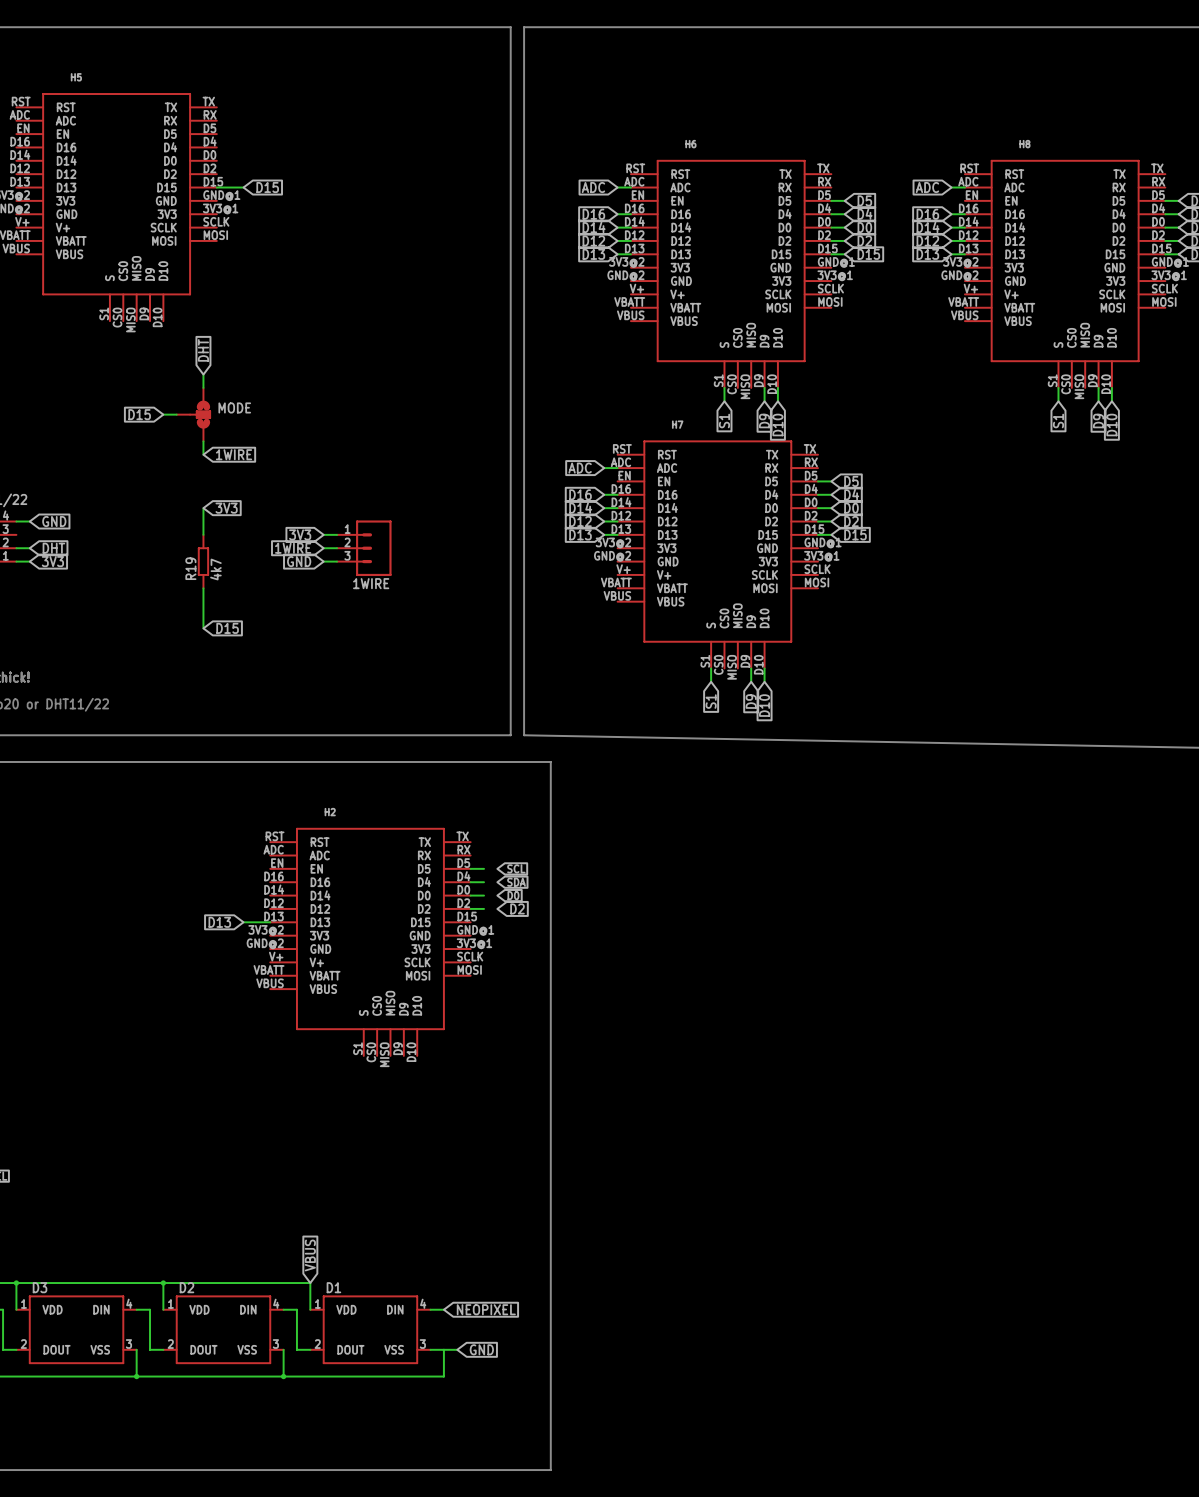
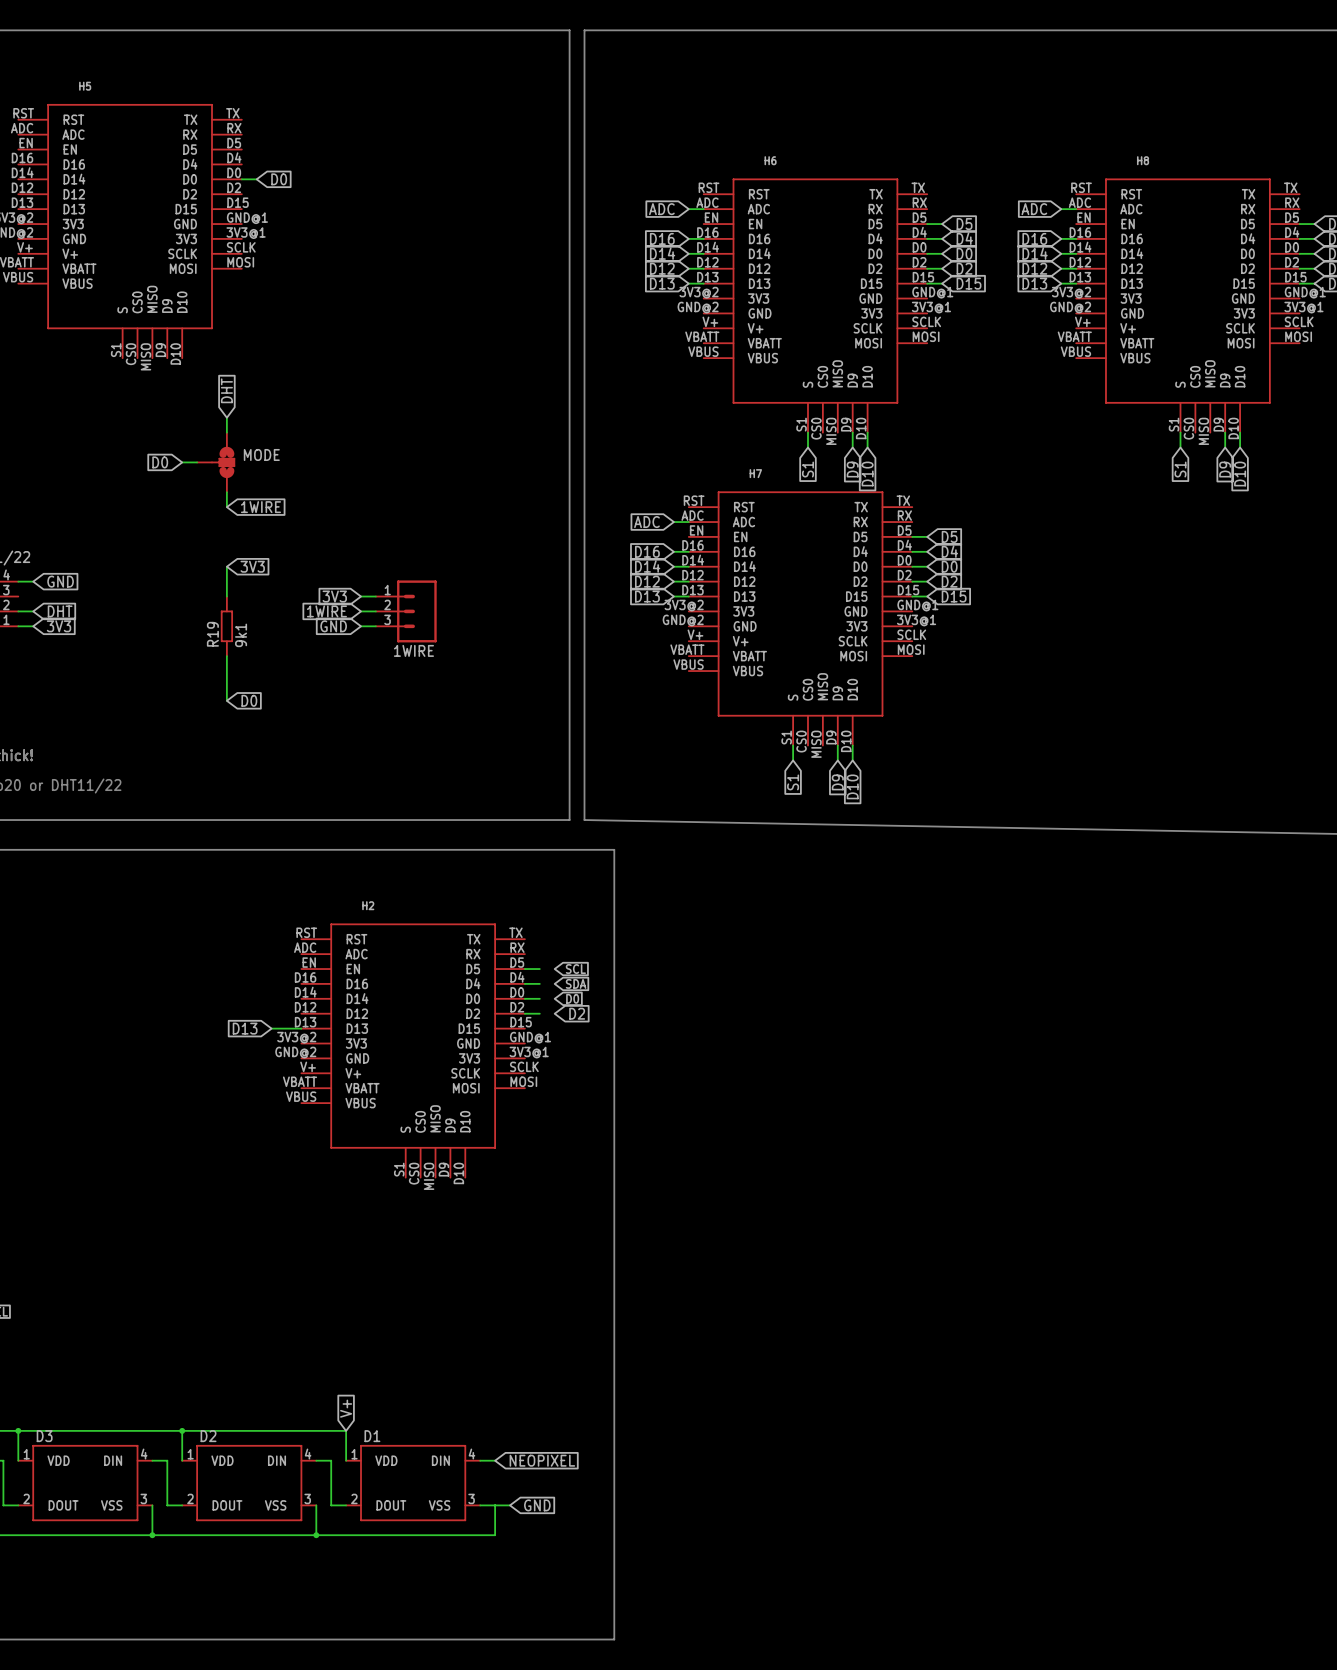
wire: none -> (241, 179) (256, 179)
global label: none -> D0 (279, 179)
wire: (216, 187) (243, 187) -> none
global label: D15 (267, 187) -> none
global label: D15 (139, 414) -> D0 (160, 462)
R19 value: 4k7 (215, 569) -> 9k1 (241, 635)
global label: D15 (227, 628) -> D0 (249, 700)
global label: VBUS (310, 1255) -> V+ (346, 1408)

